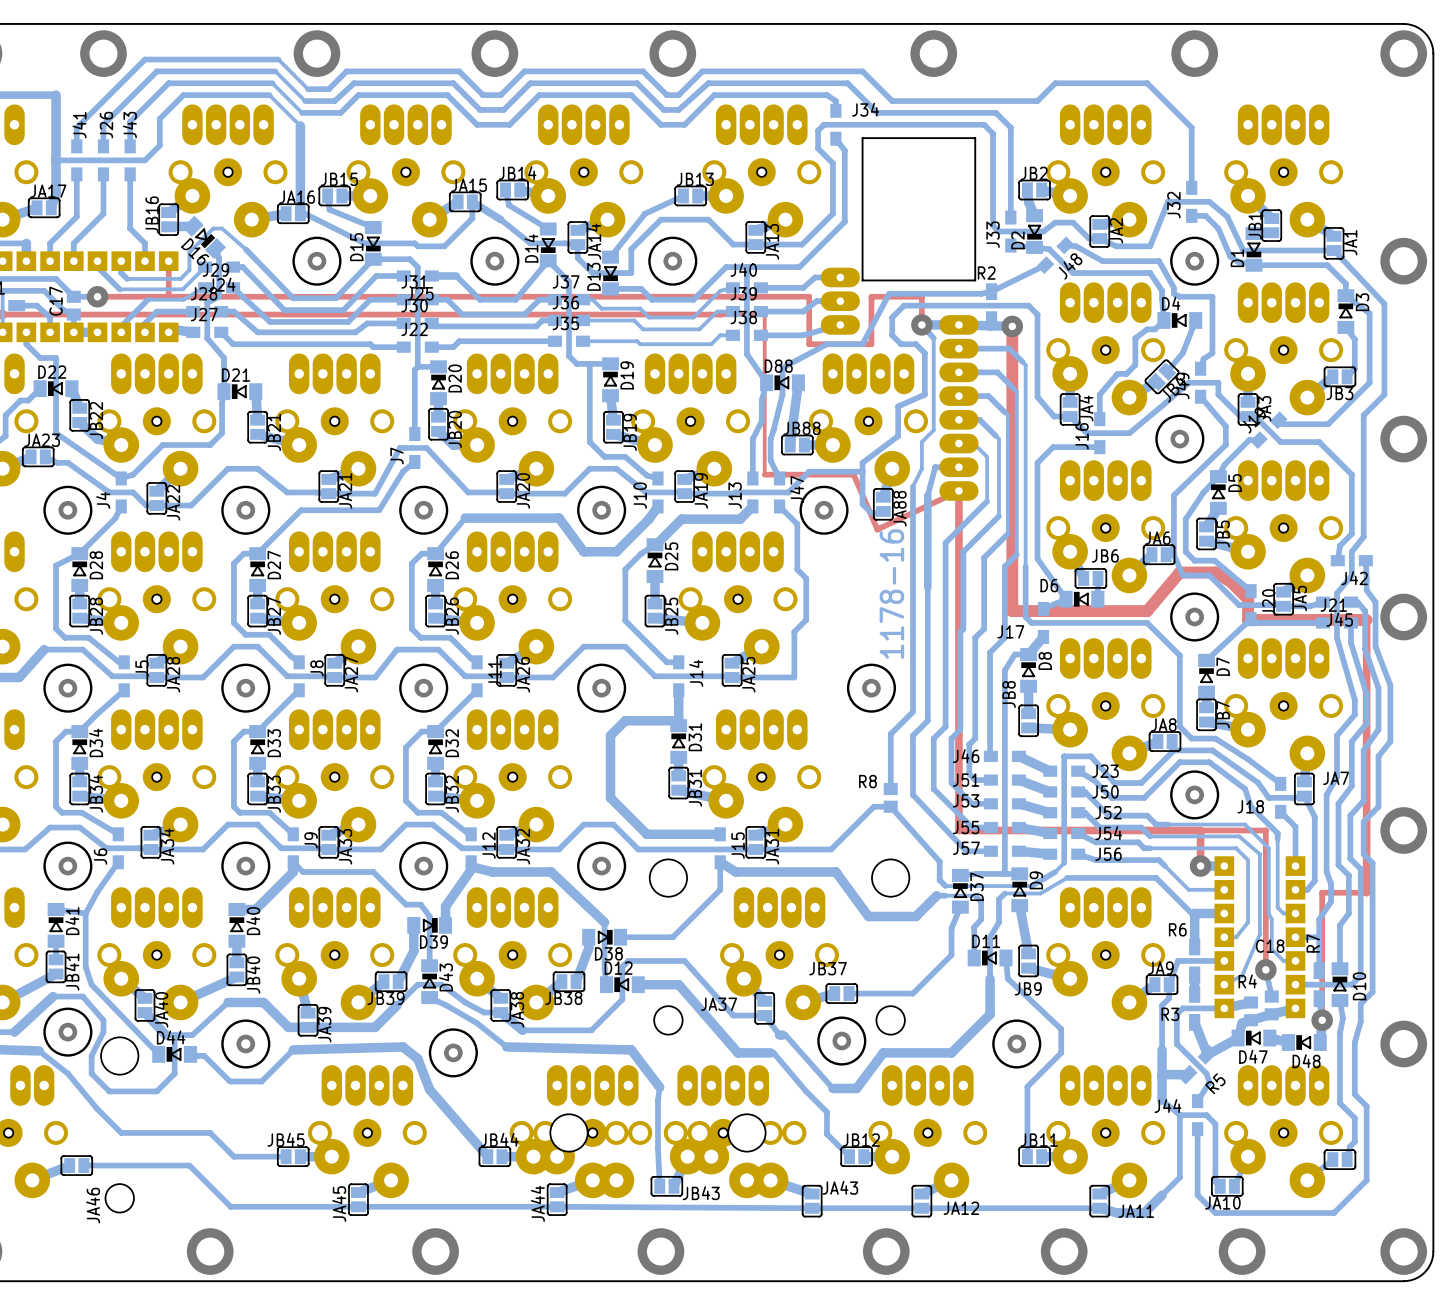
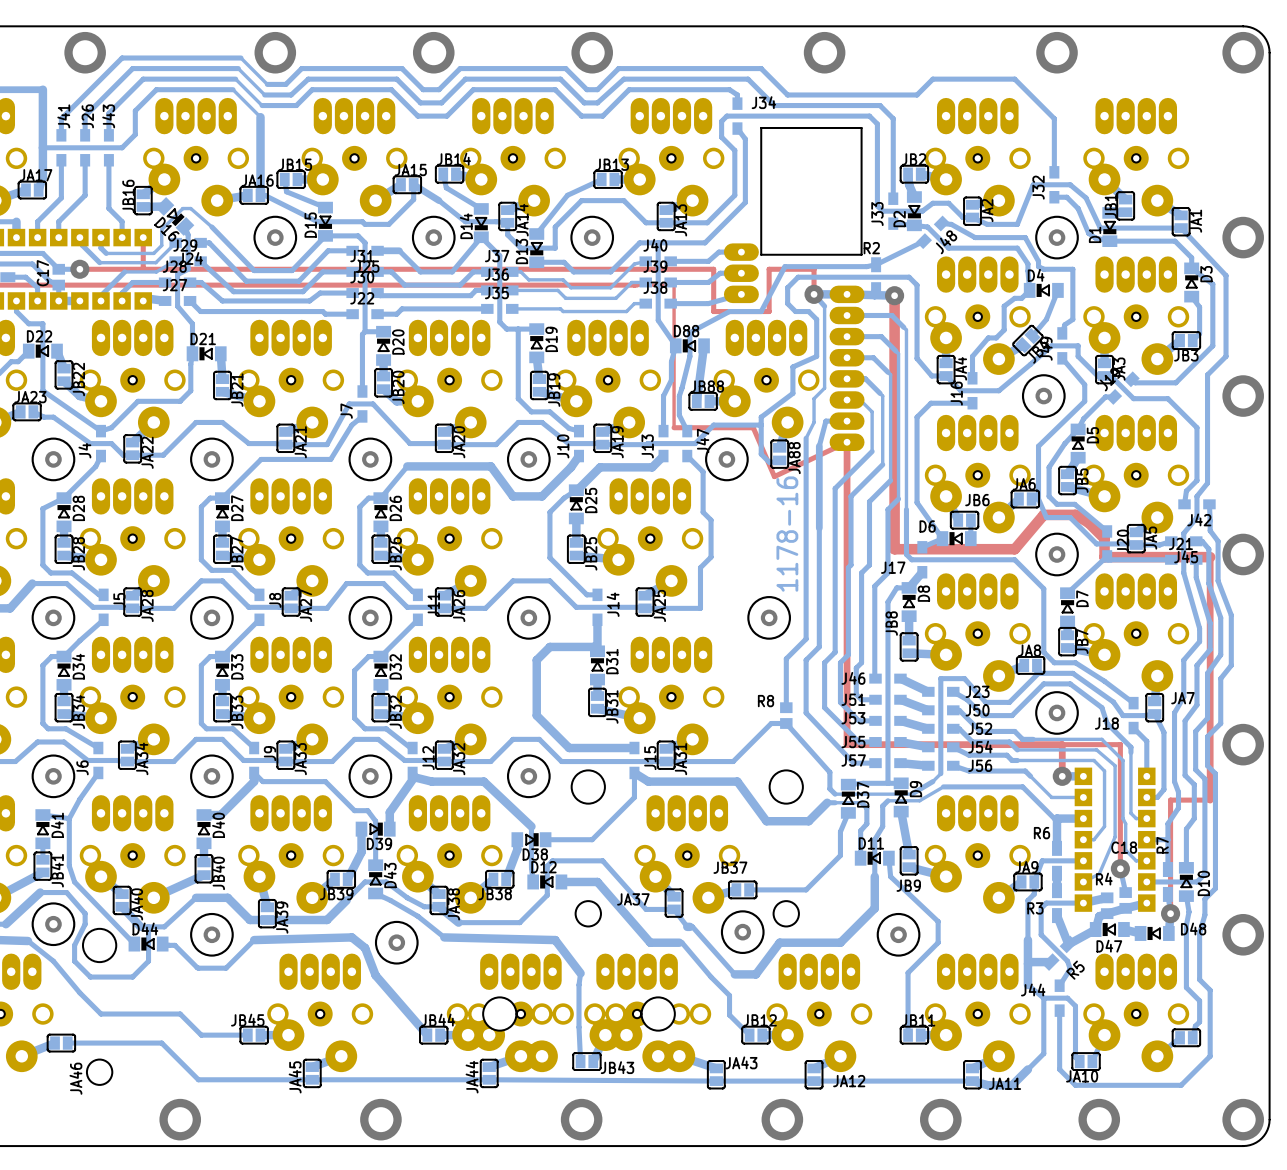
D48 name position: D48 (1306, 1061) -> D48 (1193, 928)

